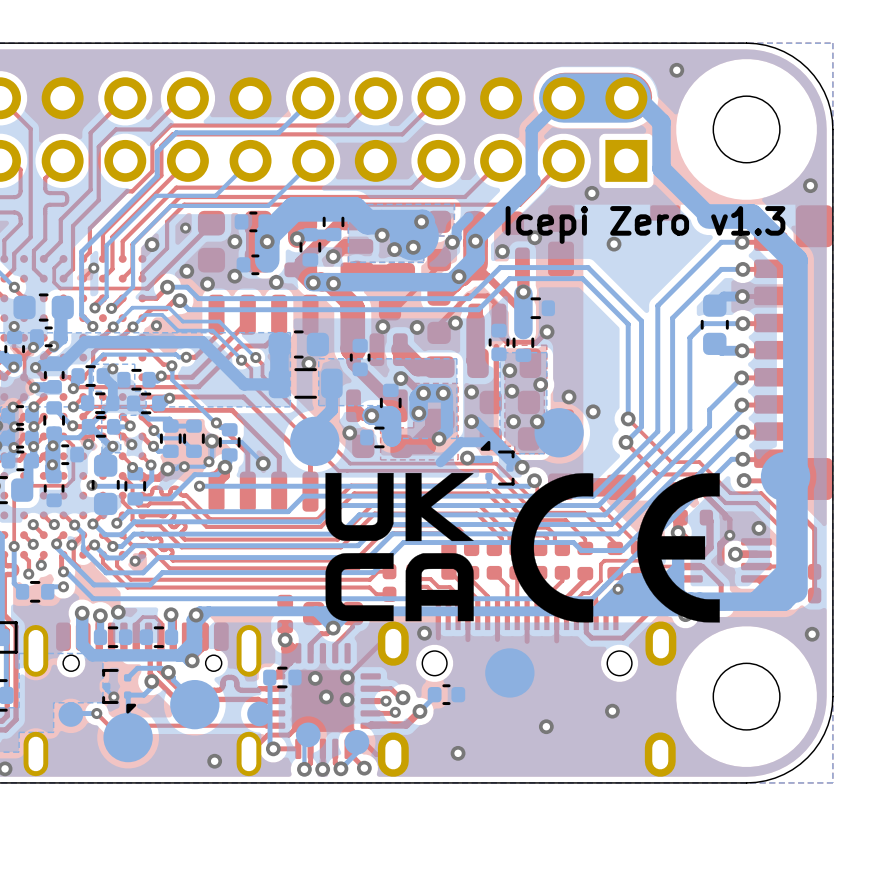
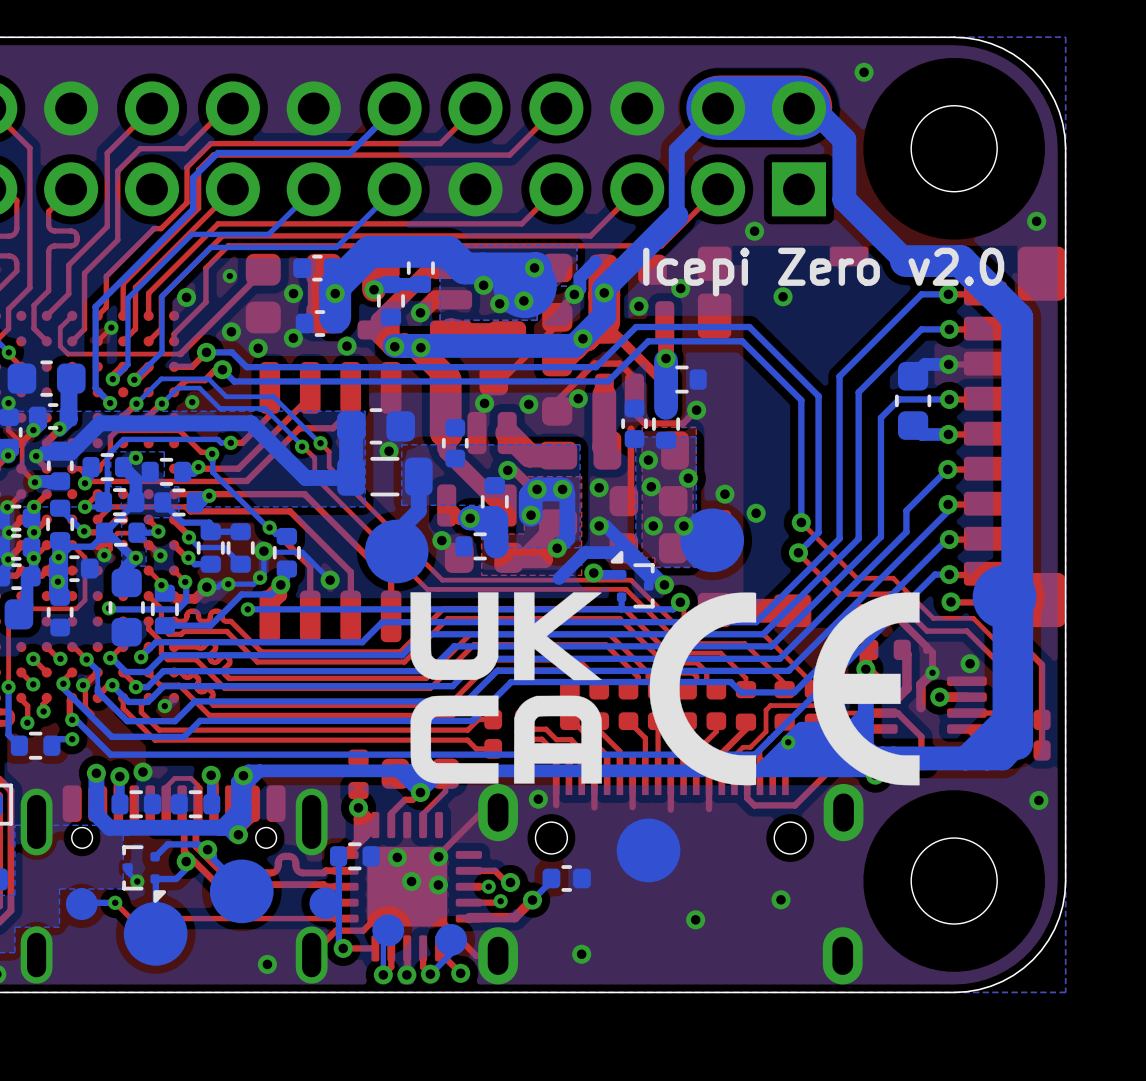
text: Icepi Zero v1.3 (645, 224) -> Icepi Zero v2.0 (823, 272)

